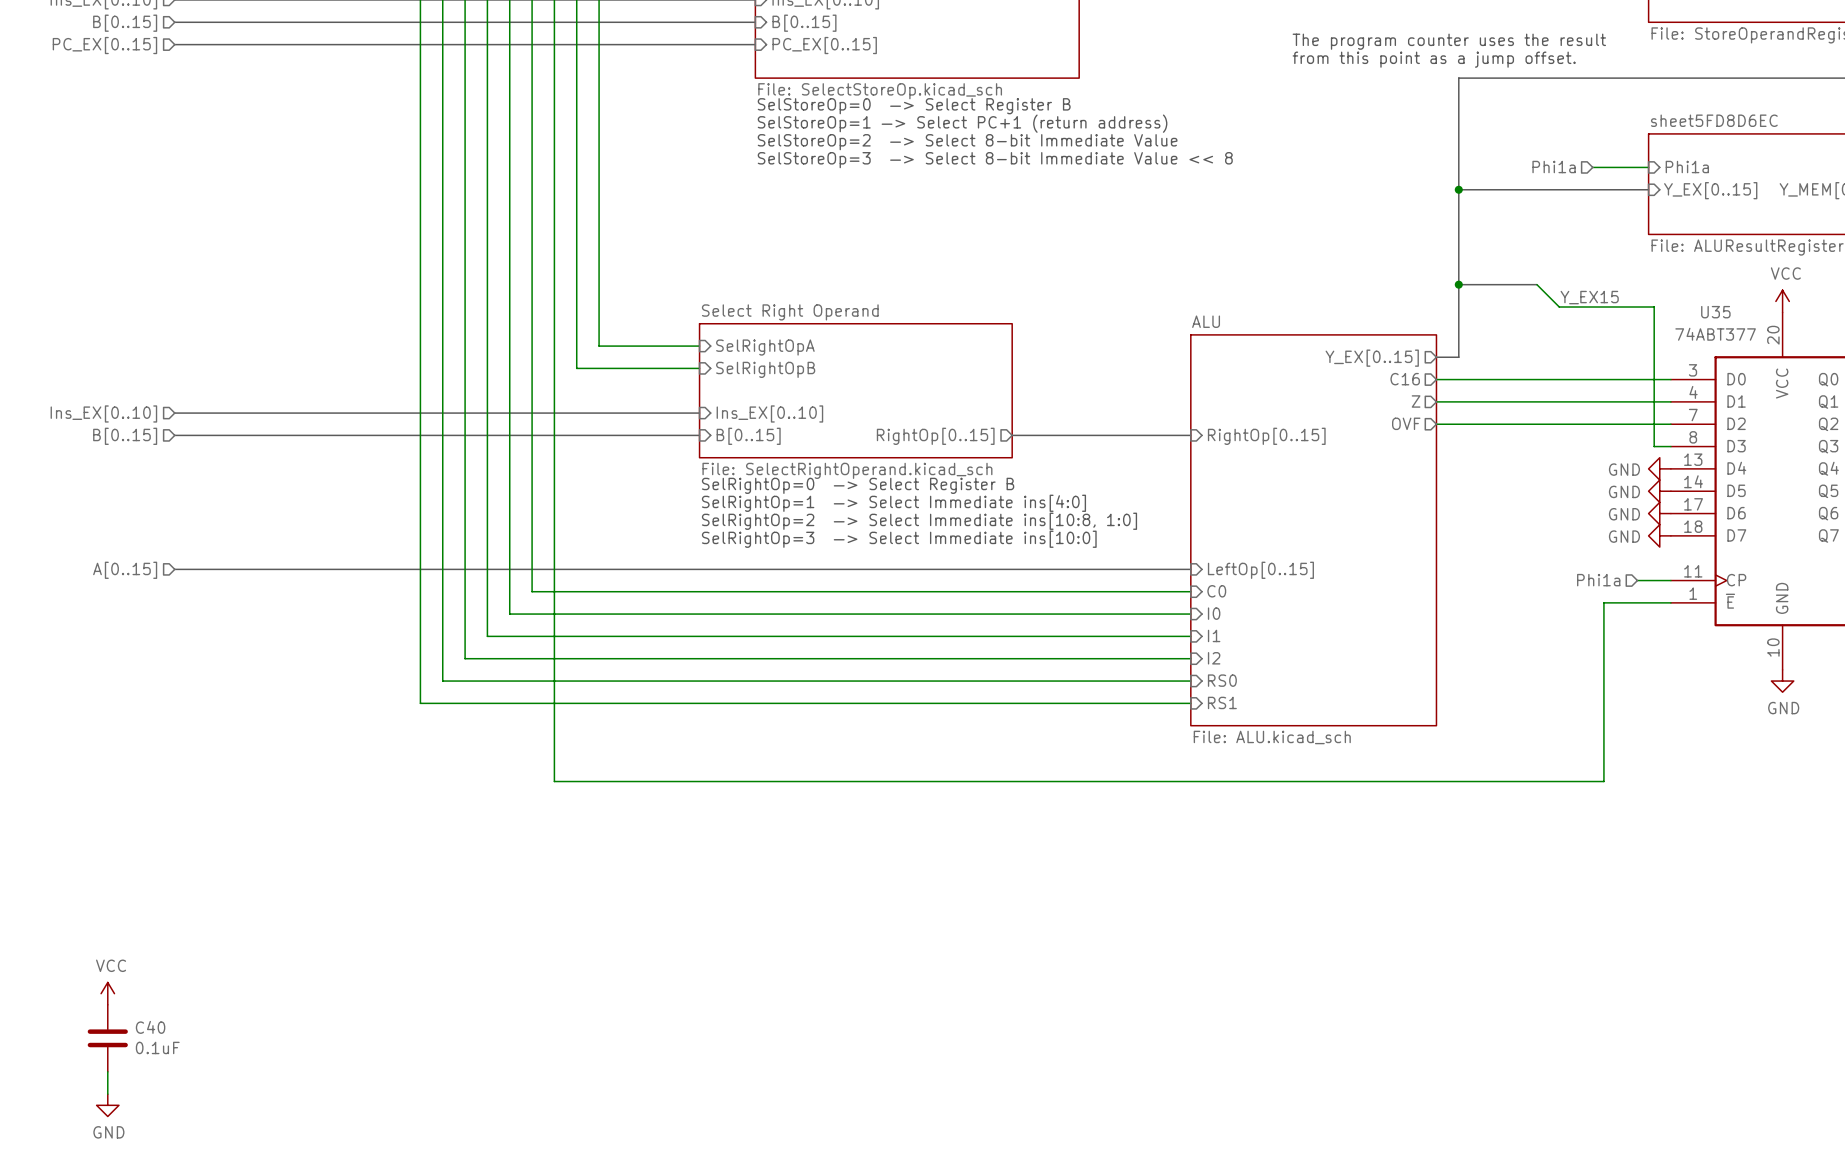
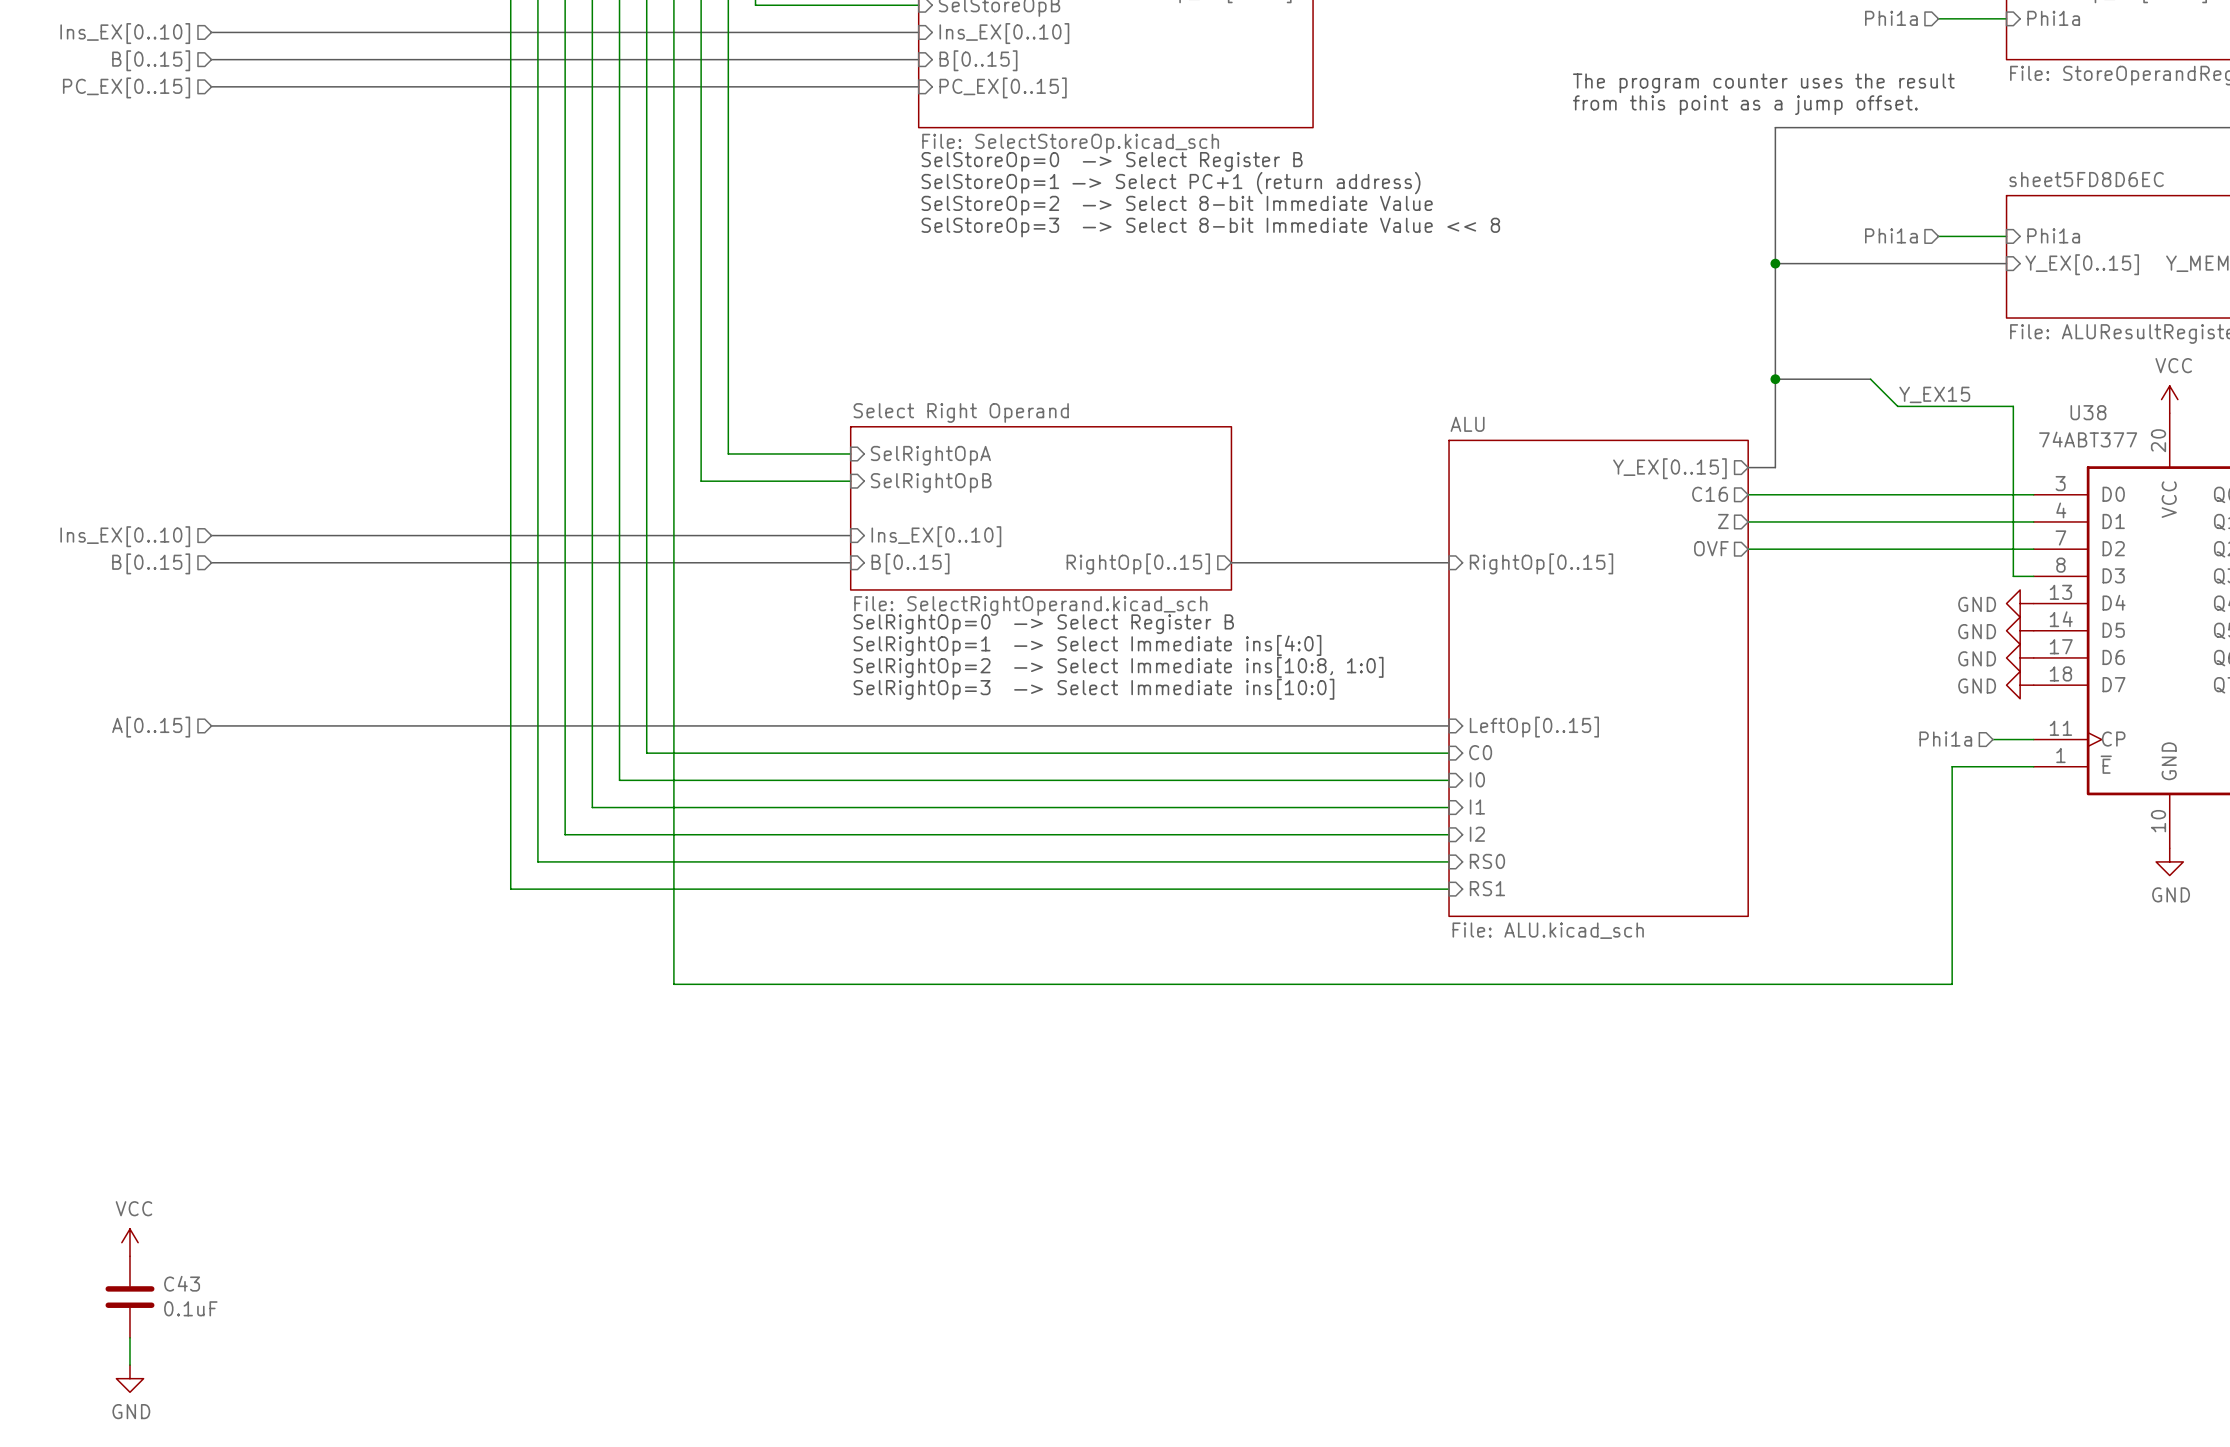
U35 name: U35 (1715, 312) -> U38 (2088, 412)
C40 name: C40 (150, 1027) -> C43 (182, 1283)

